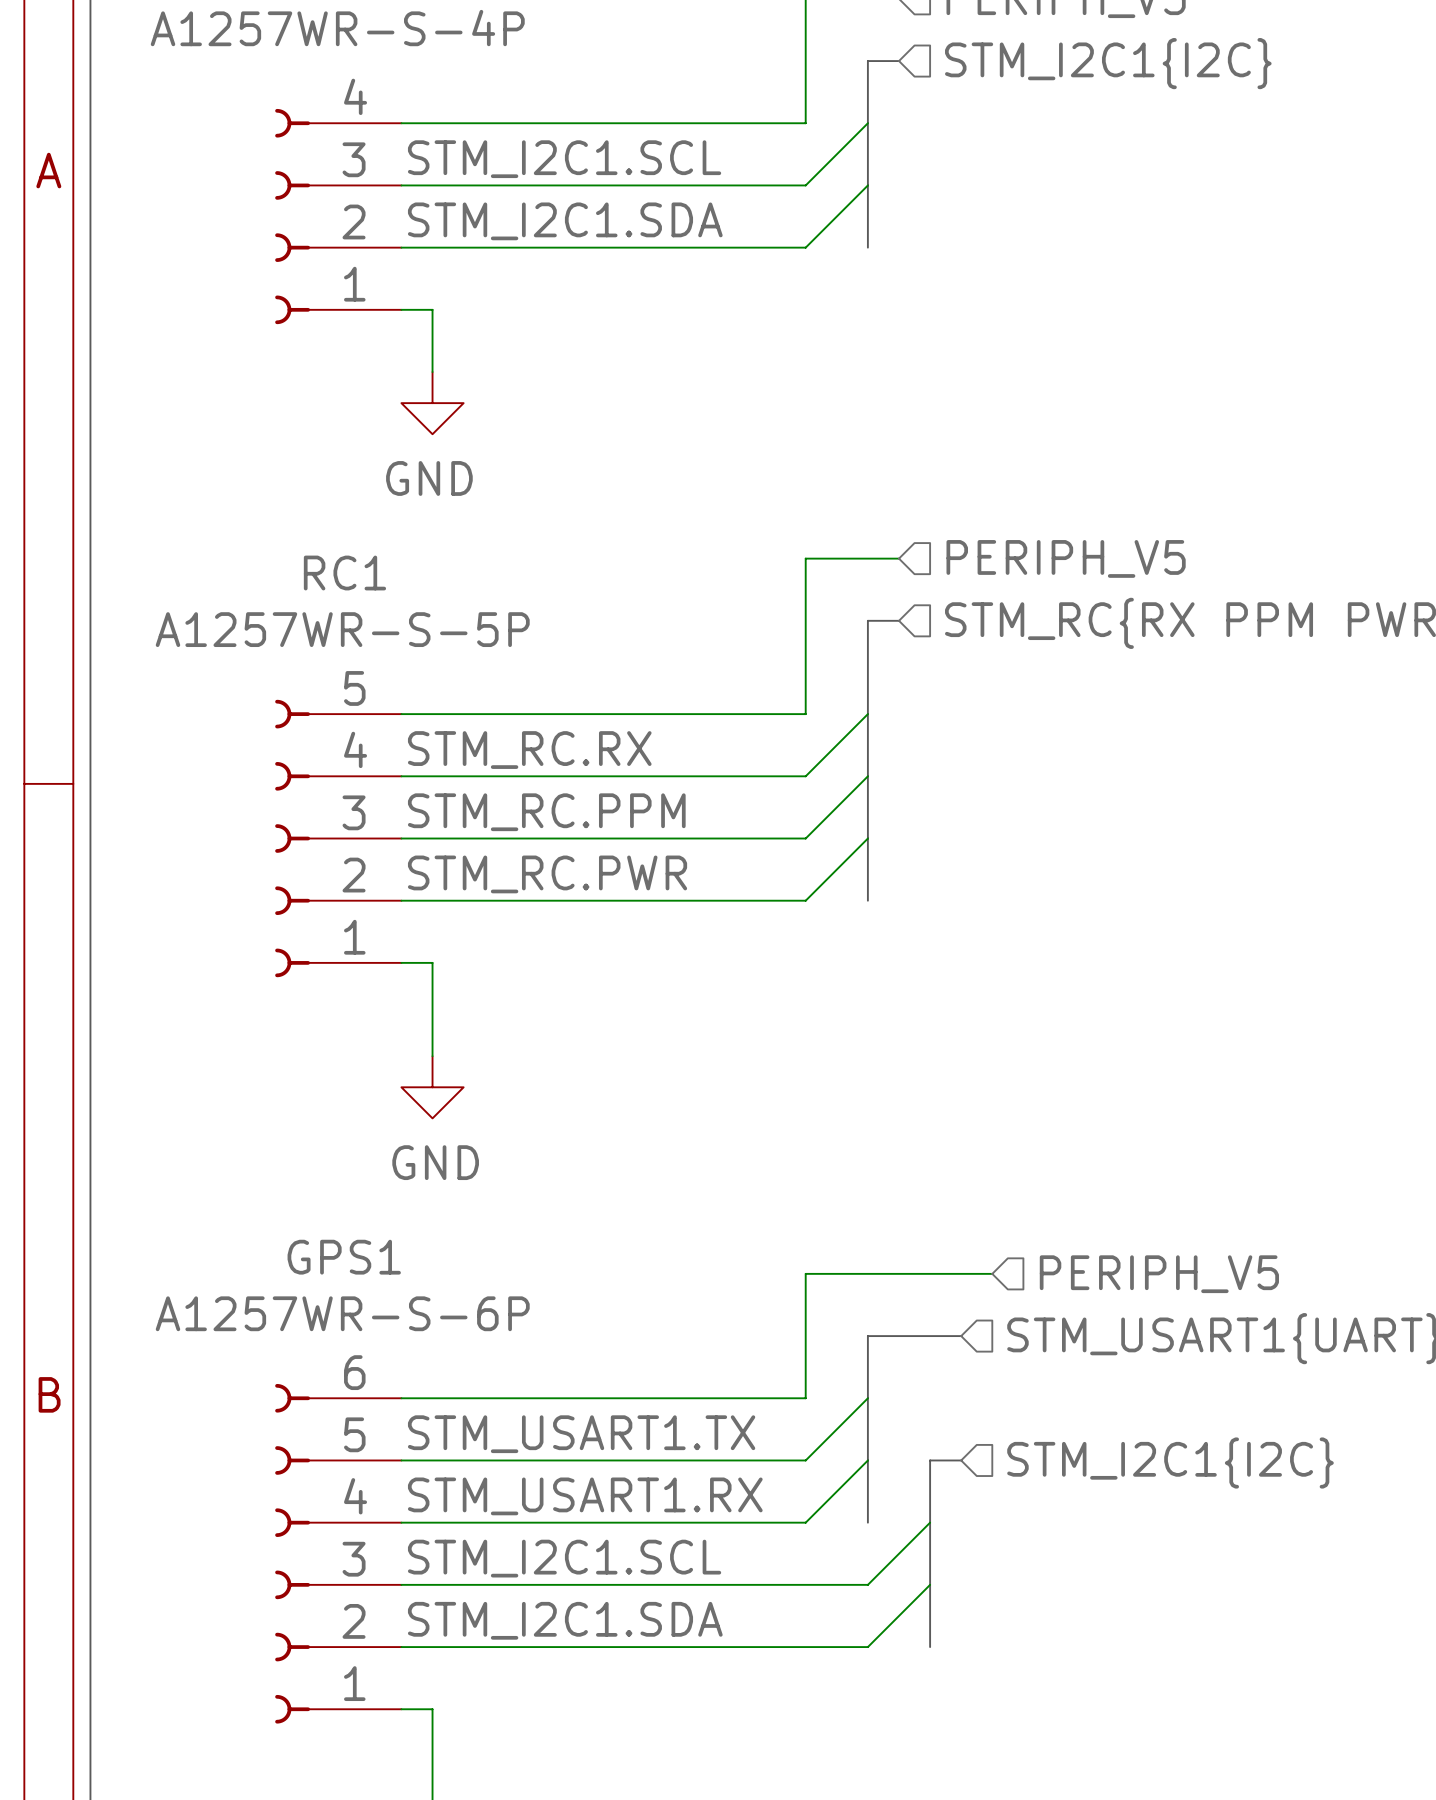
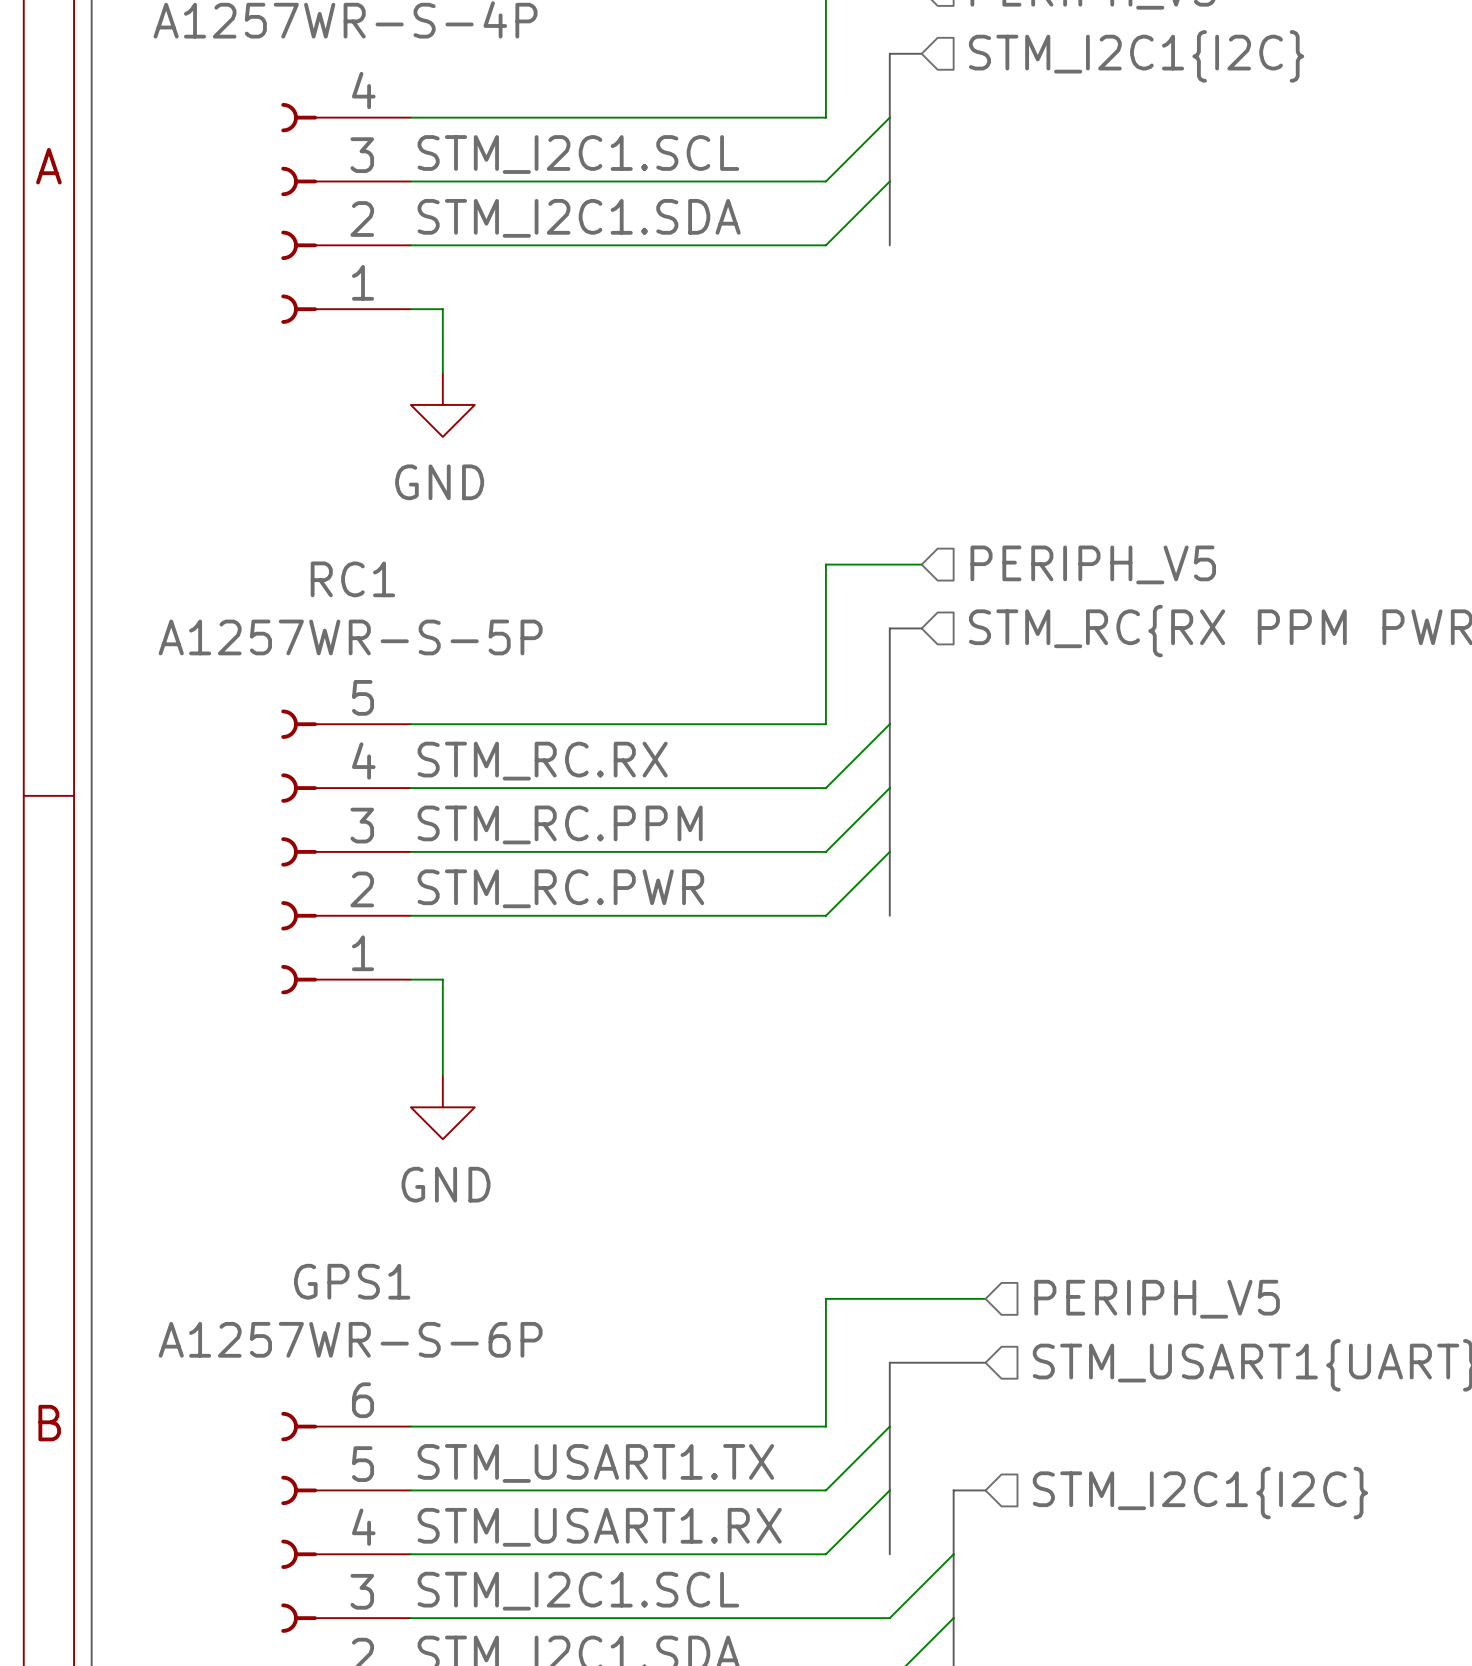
wire: (961, 1273) (992, 1273) -> none
hierarchical label position: PERIPH_V5 (1159, 1274) -> PERIPH_V5 (1157, 1299)

